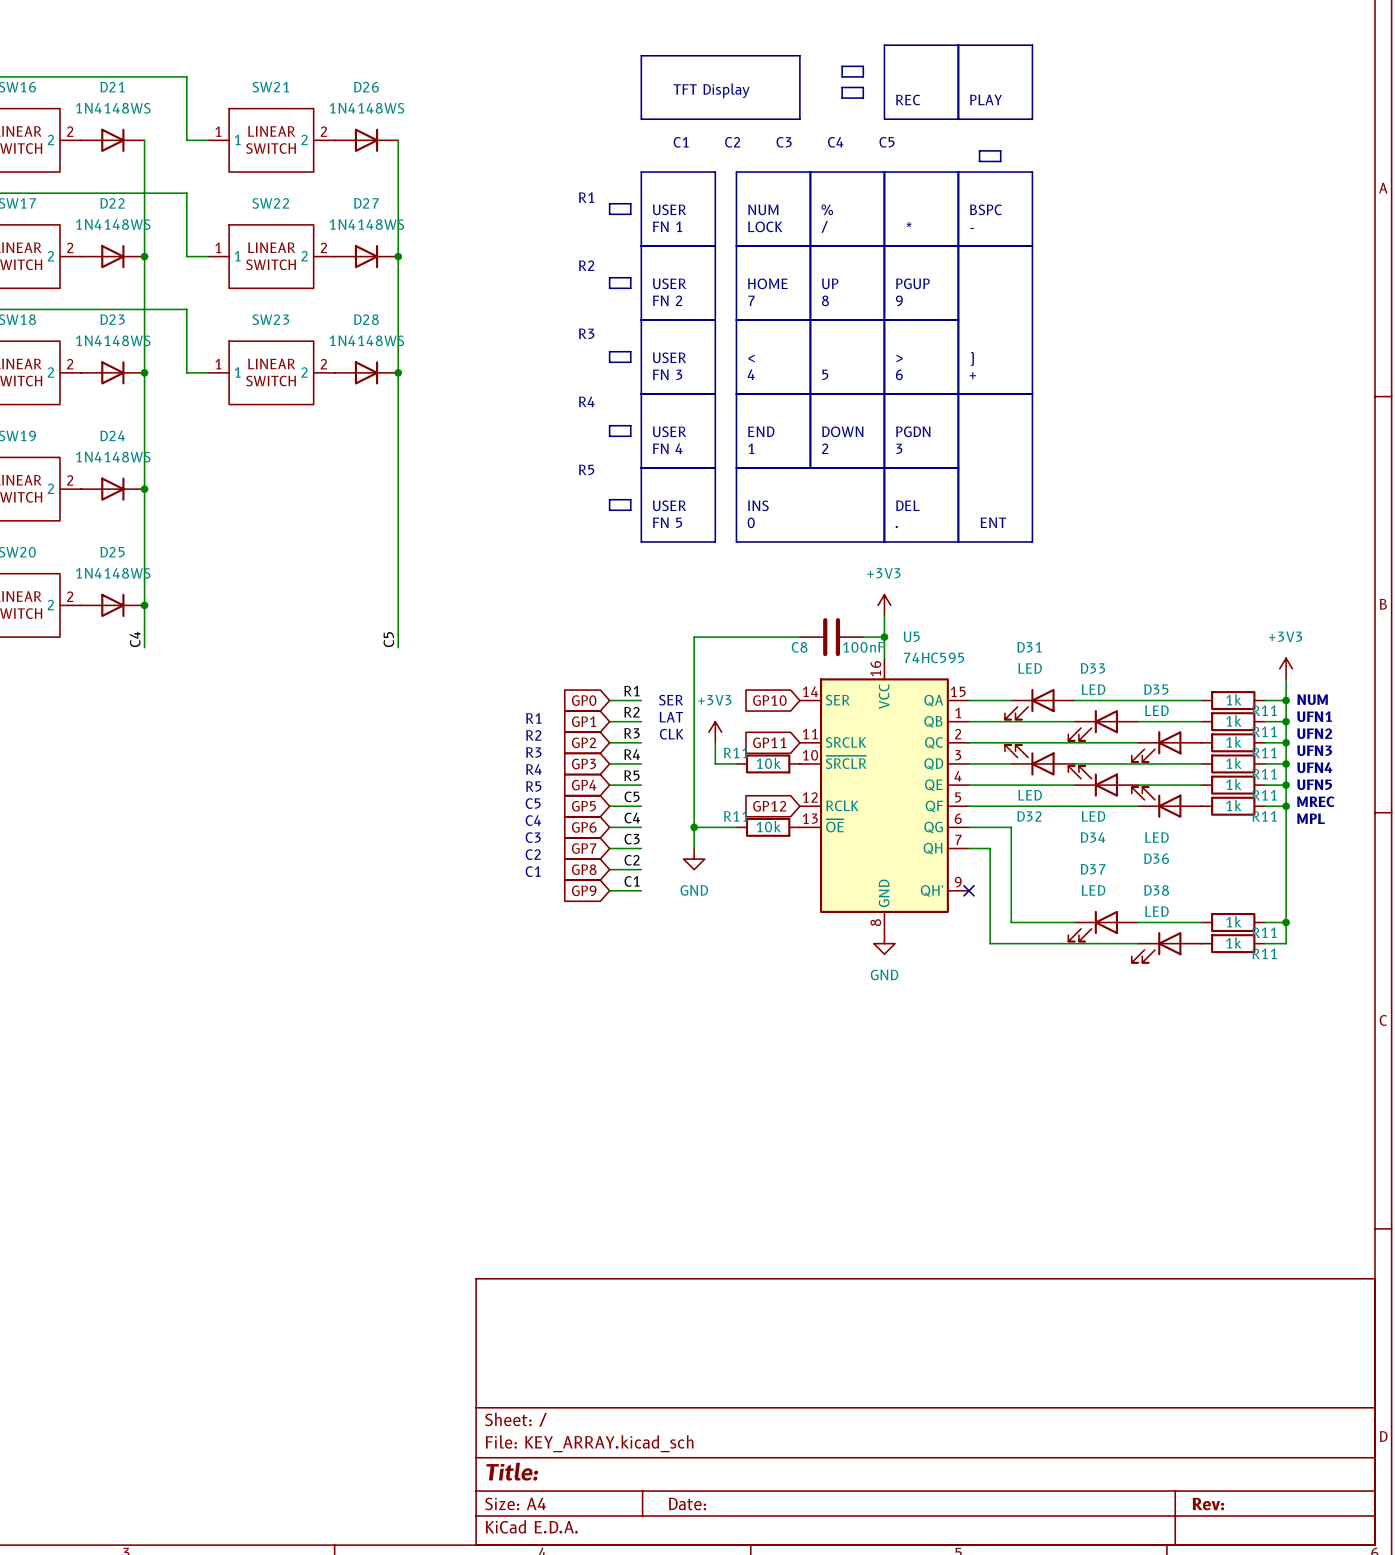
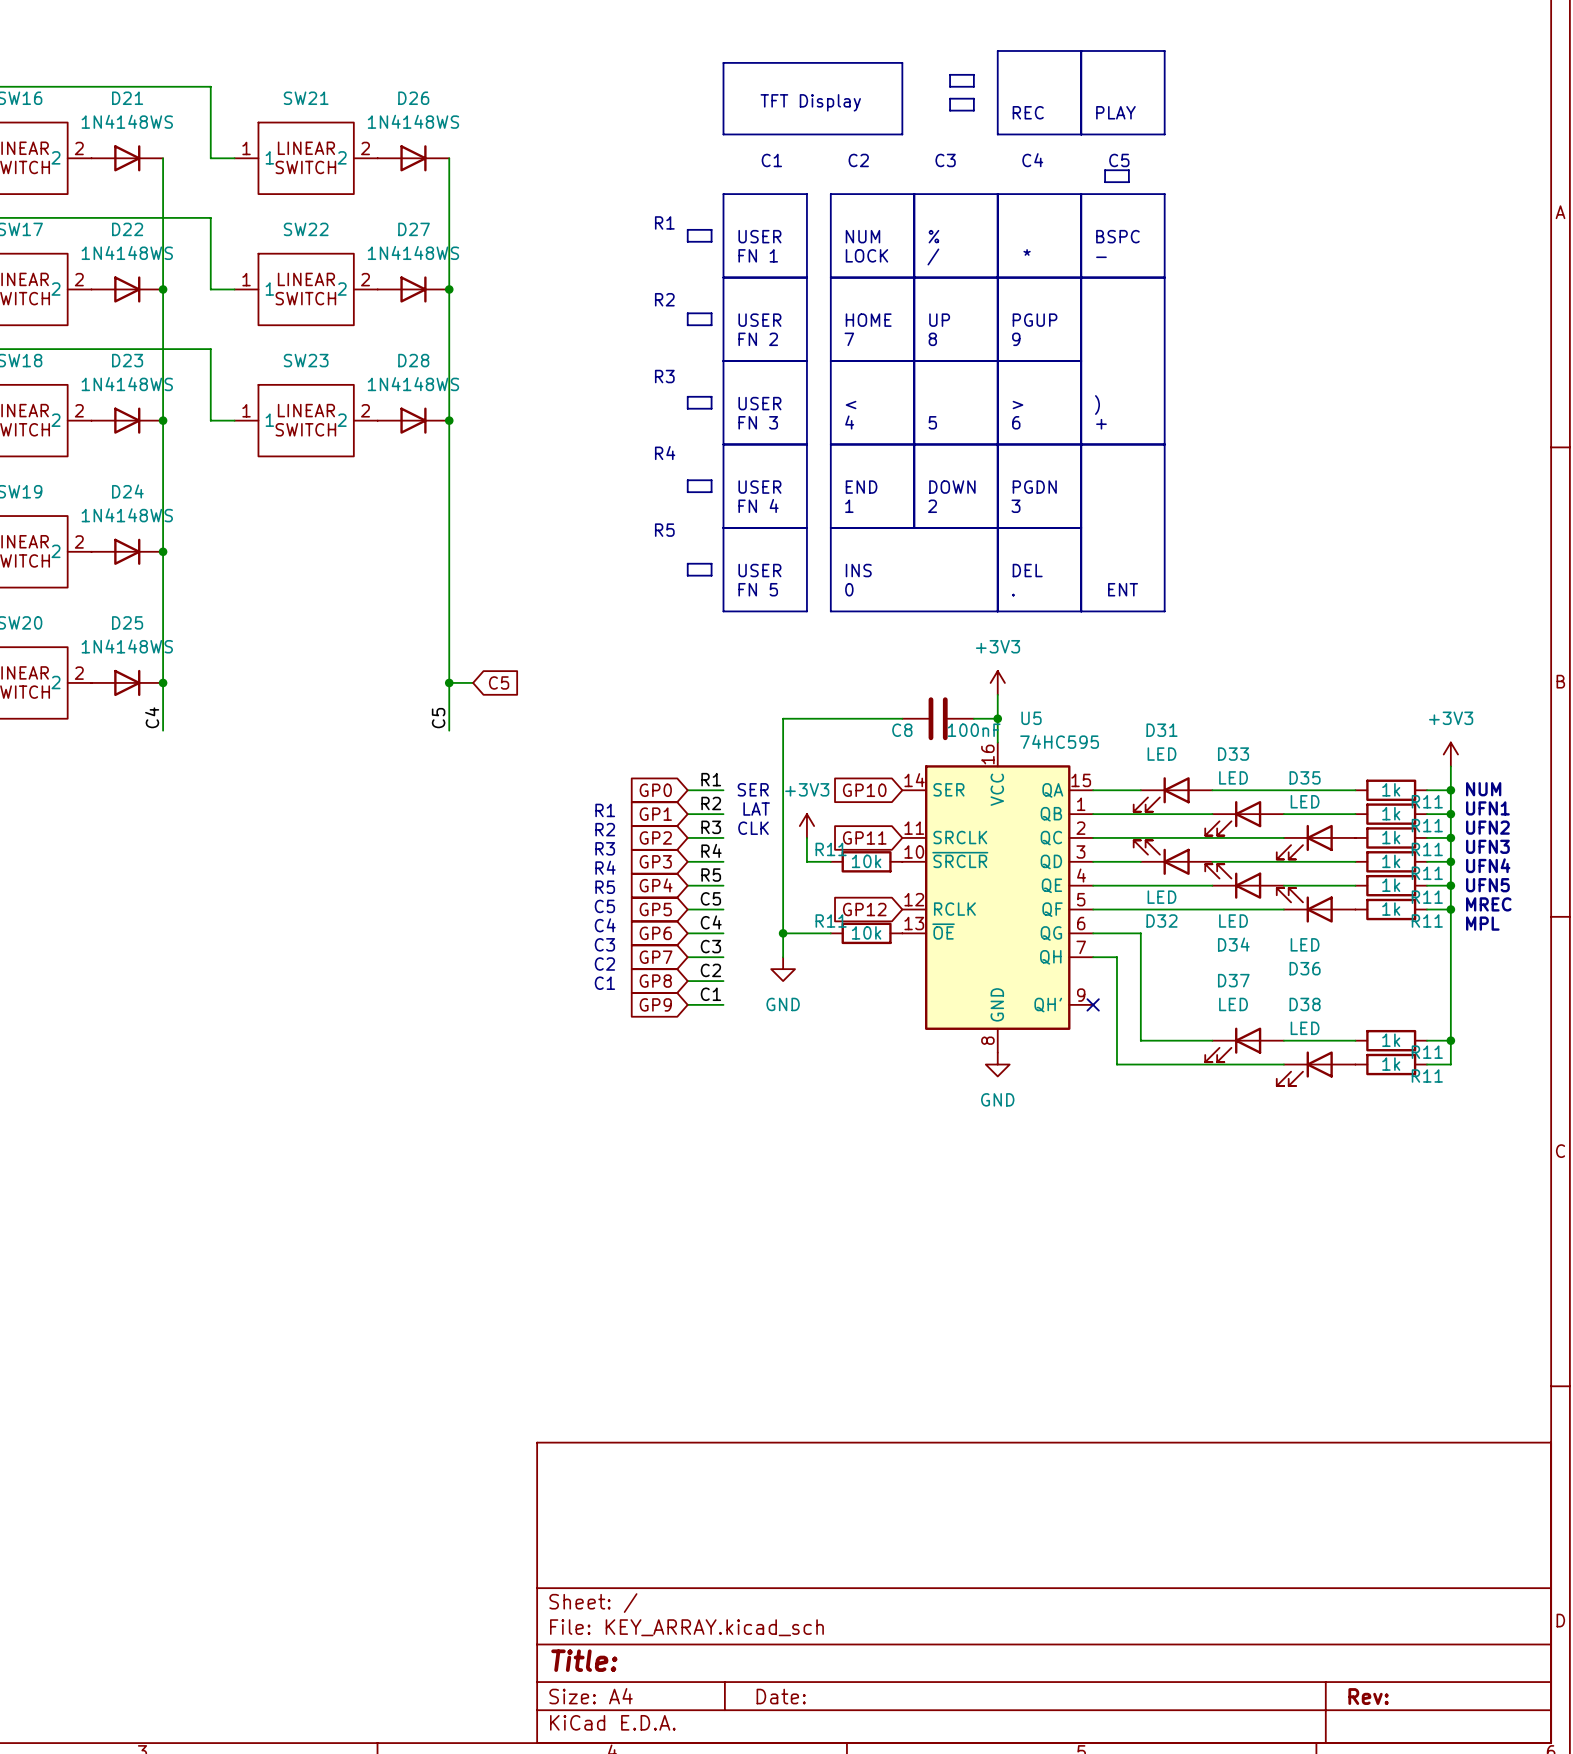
wire: none -> (449, 682) (473, 682)
junction: none -> (449, 682)
global label: none -> C5 (499, 682)

